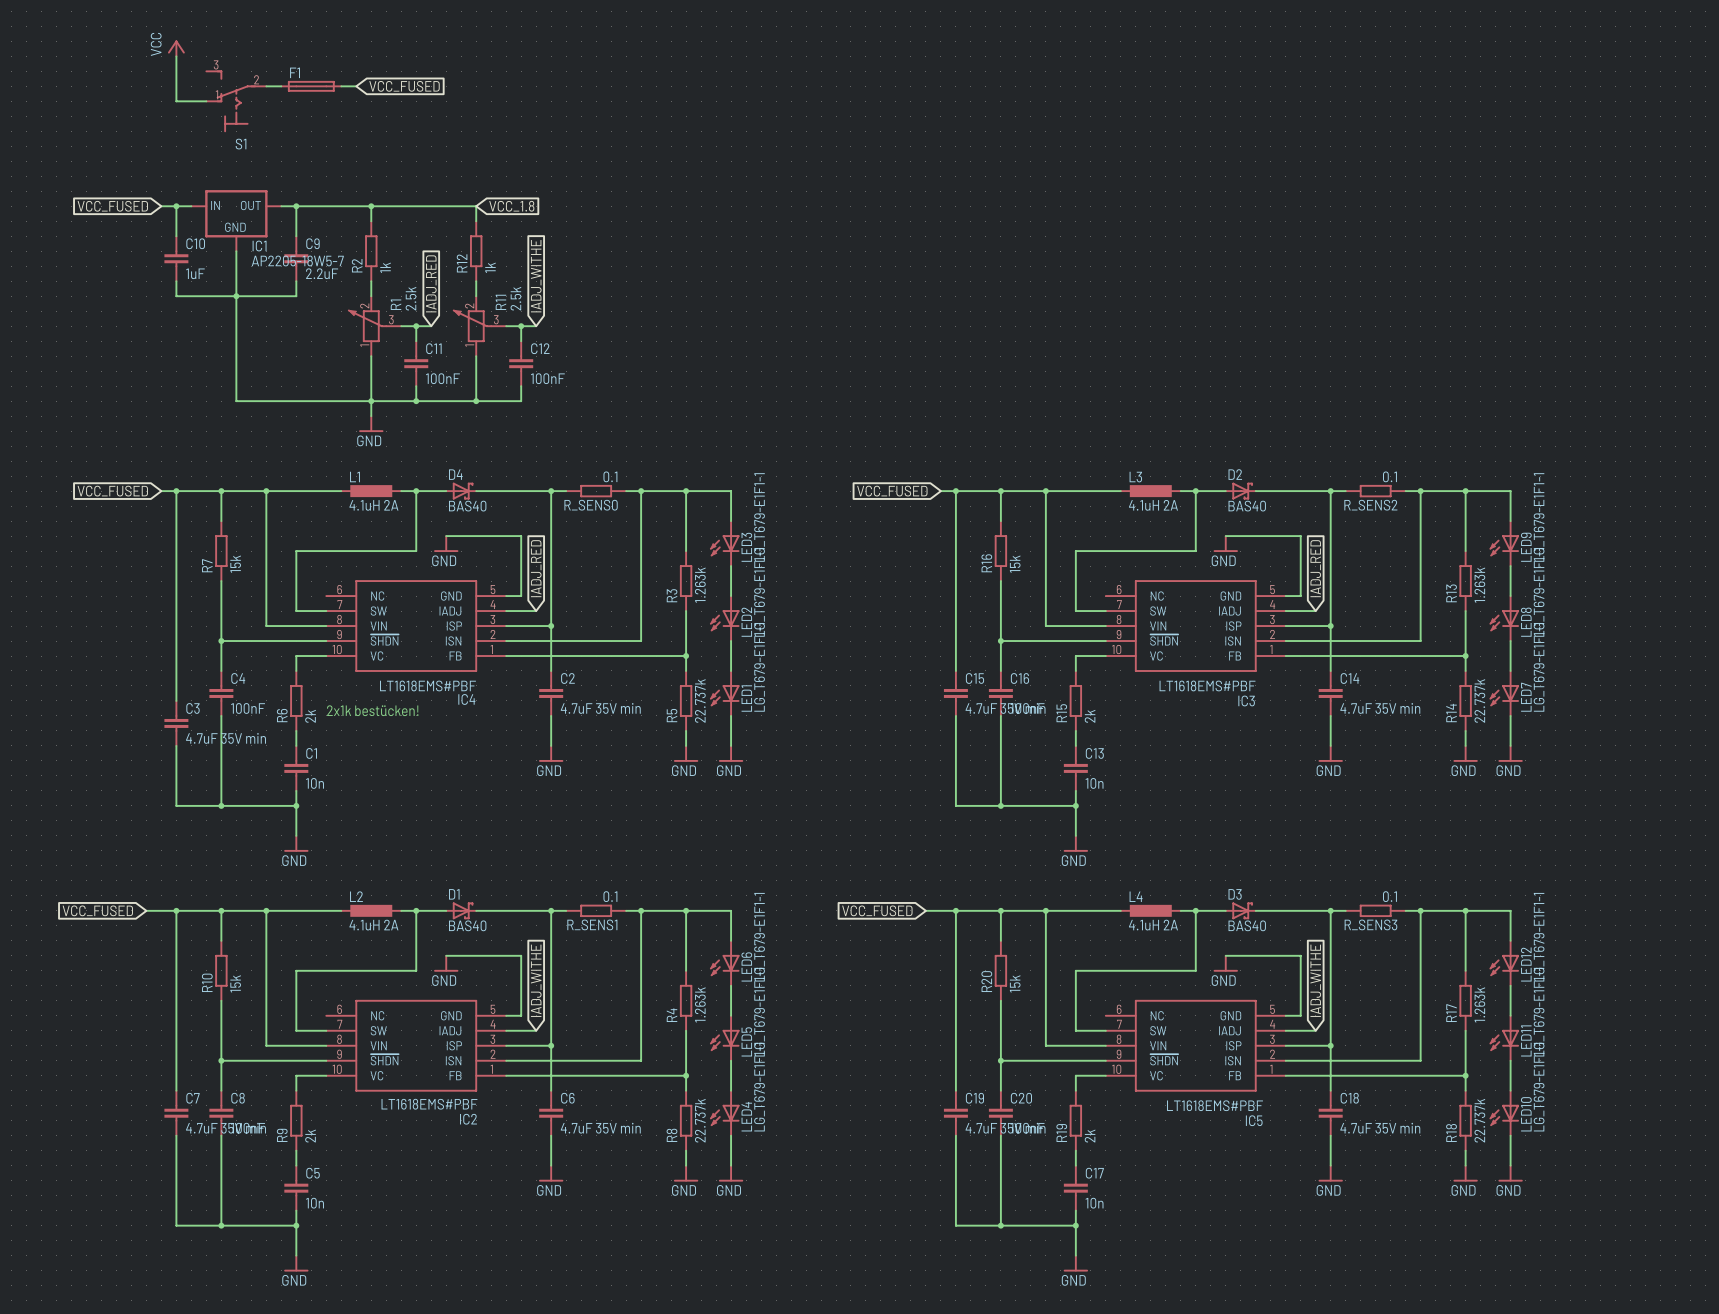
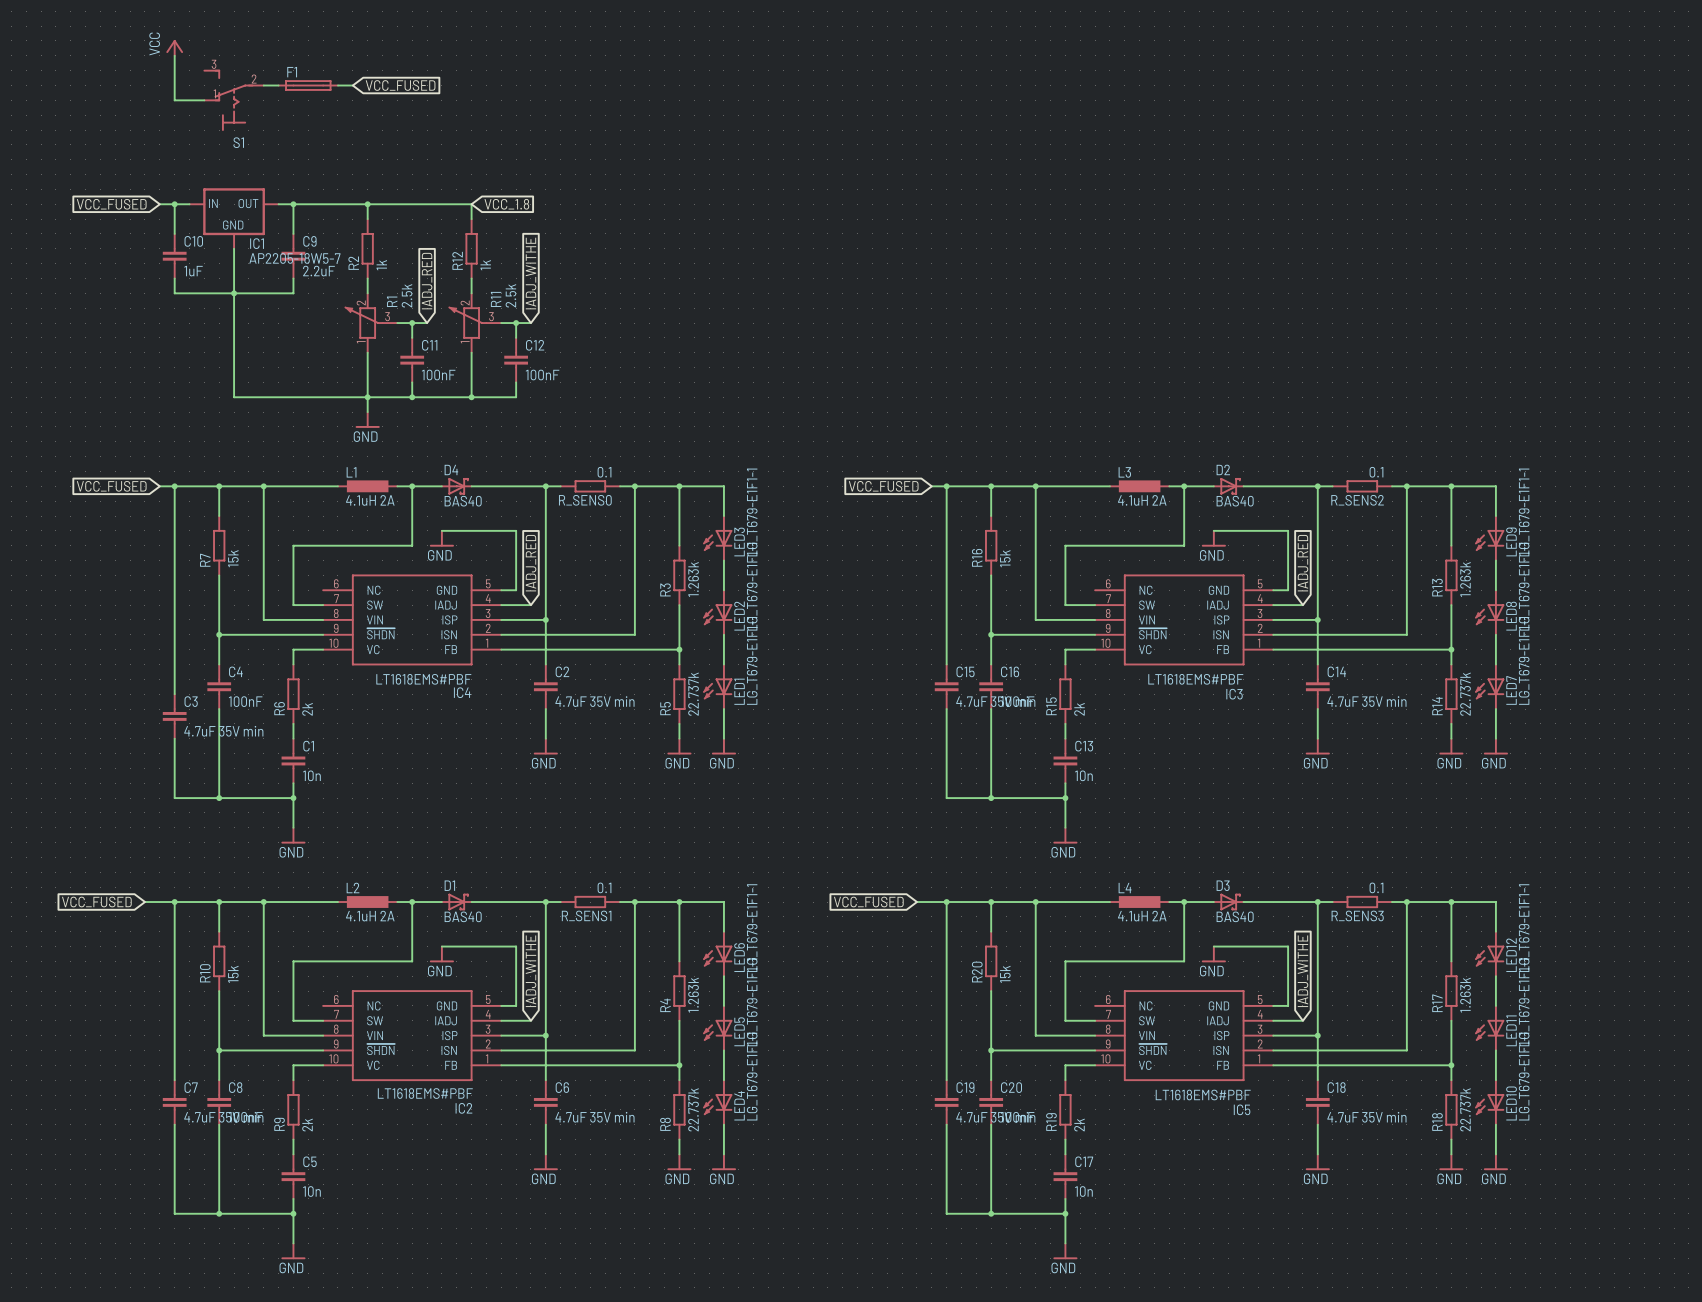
text: 2x1k bestücken! (372, 710) -> none

